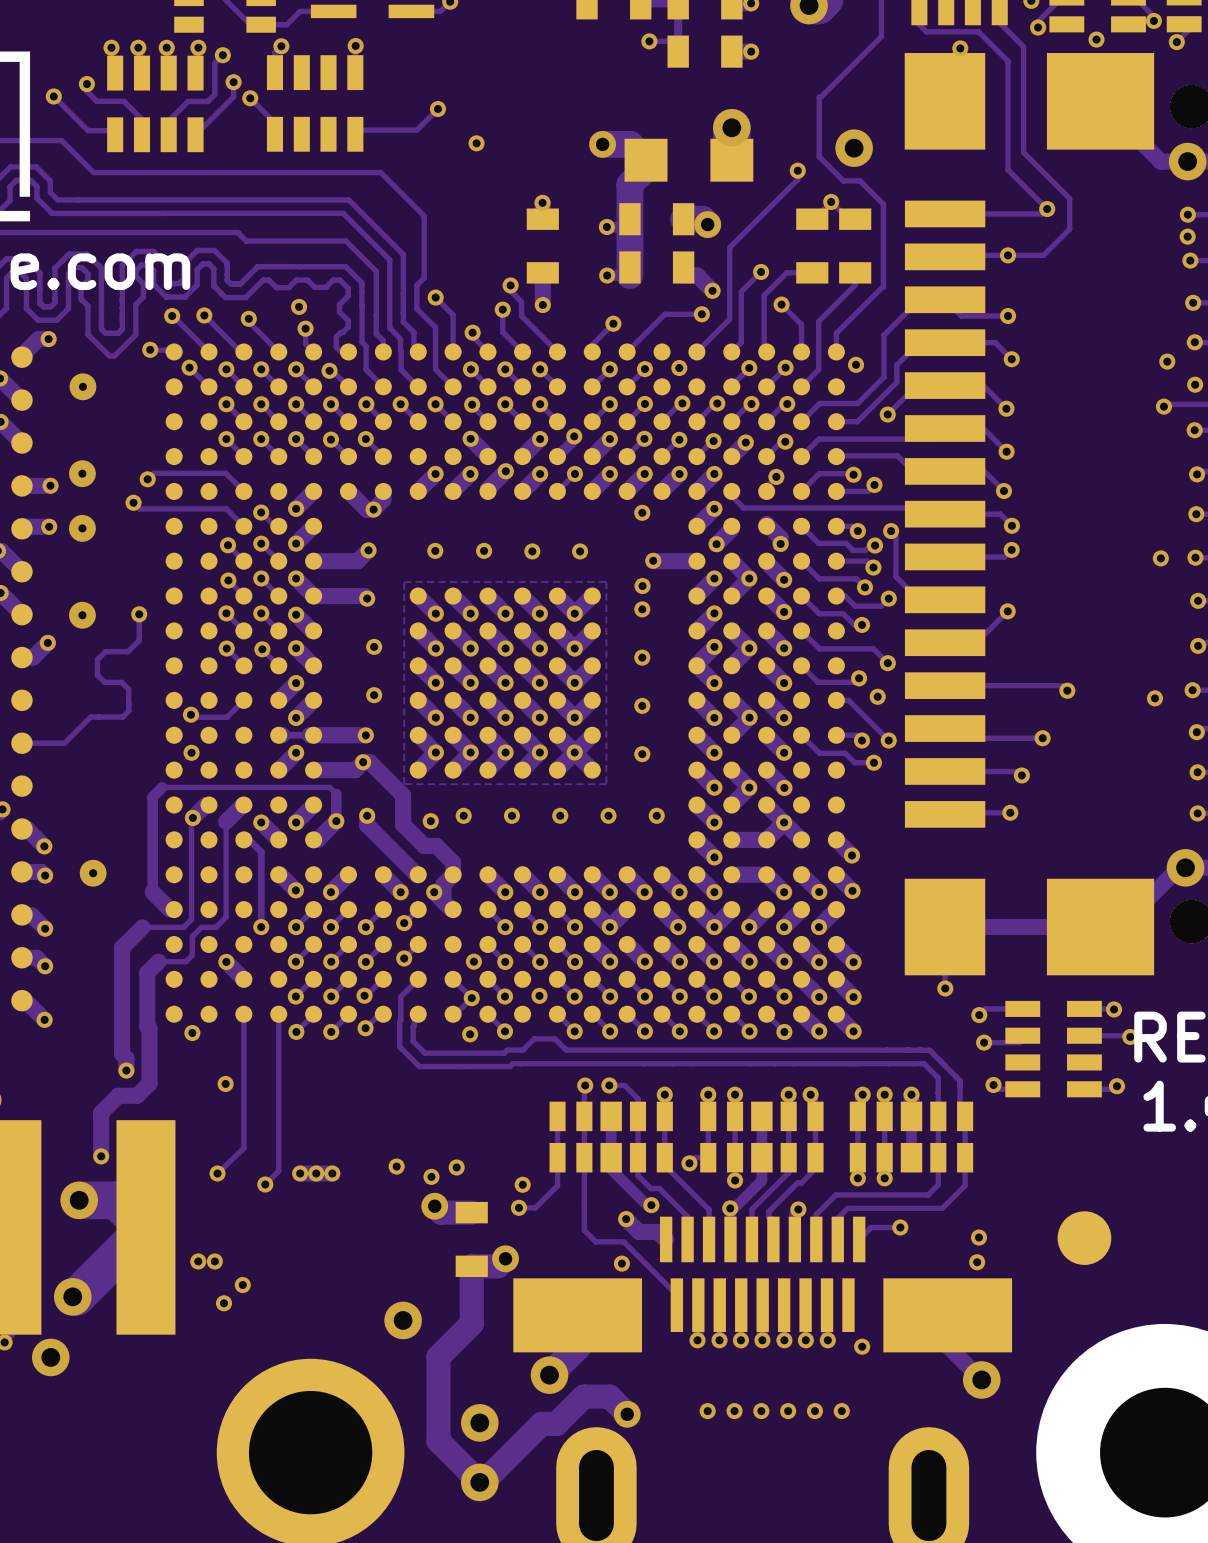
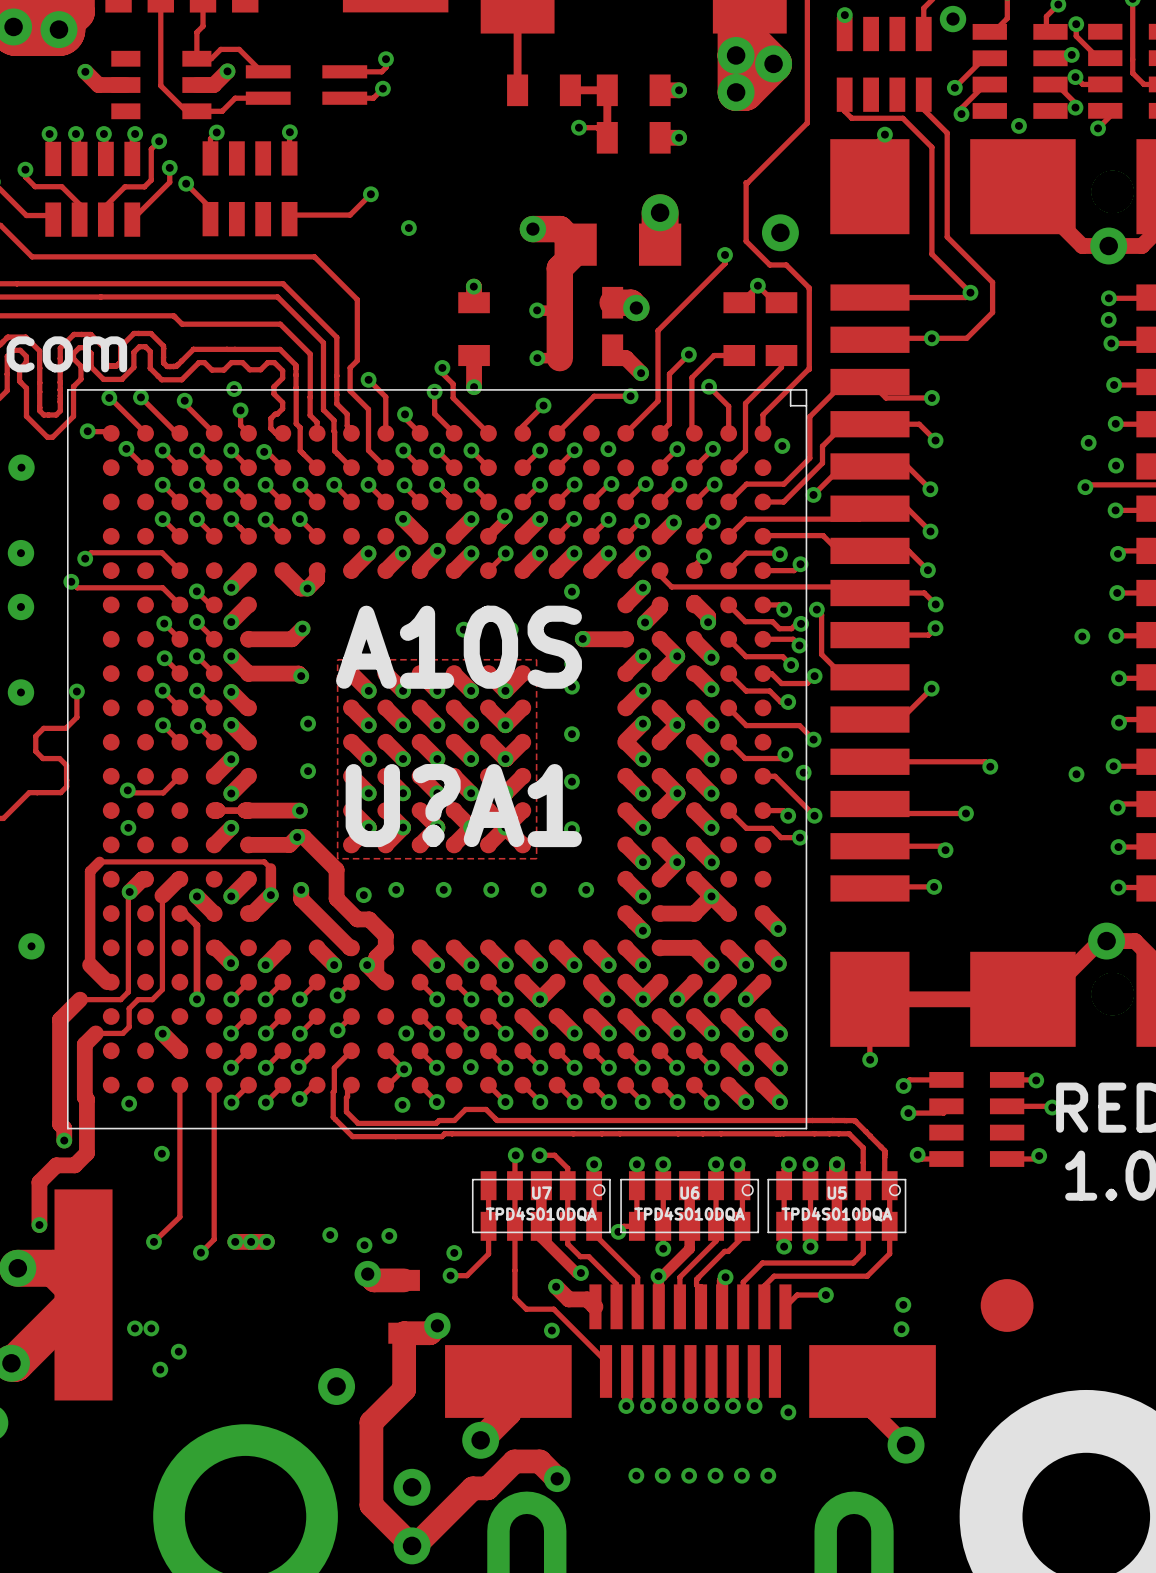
part: (505, 683) -> none
U?A1: none -> A10S (437, 759)
part: (611, 1137) -> none
U7: none -> TPD4S010DQA (541, 1206)
part: (761, 1137) -> none
U6: none -> TPD4S010DQA (689, 1206)
part: (911, 1137) -> none
U5: none -> TPD4S010DQA (836, 1206)

